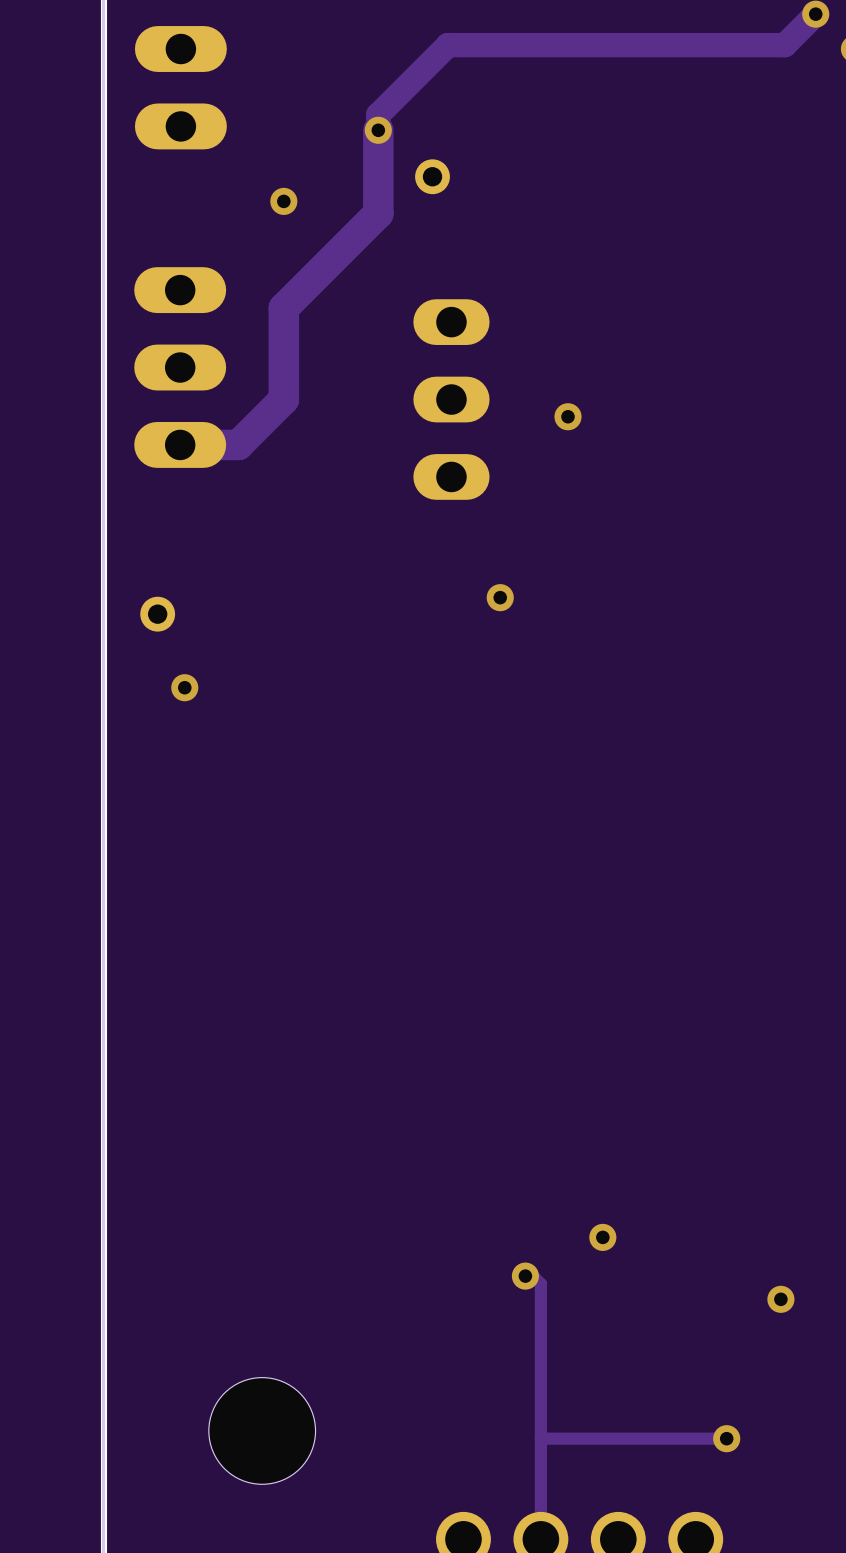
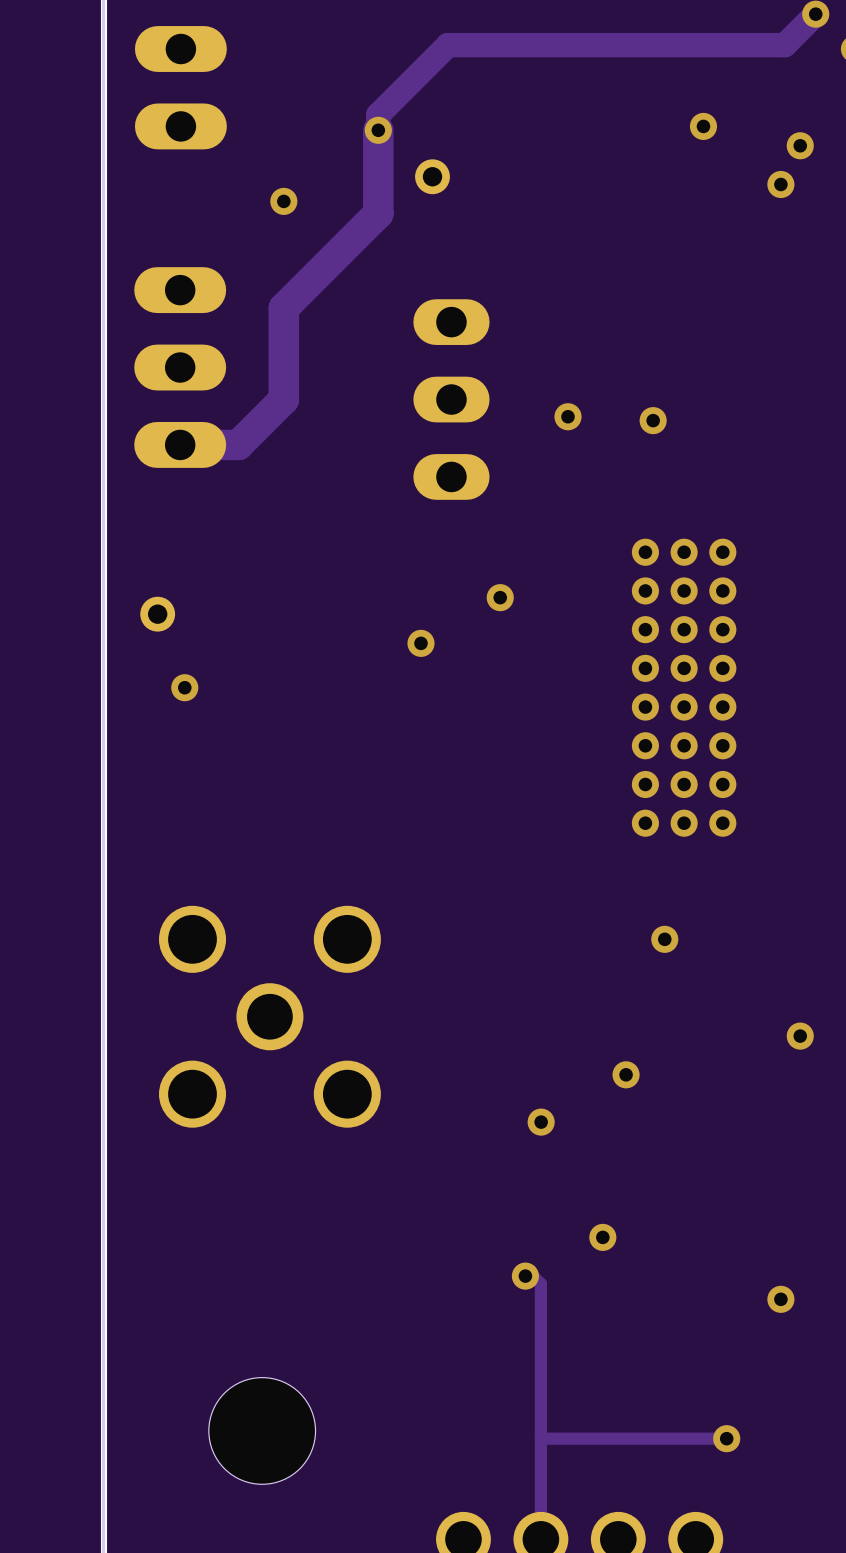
via: none -> (703, 126)
via: none -> (800, 145)
via: none -> (780, 184)
via: none -> (653, 420)
via: none -> (645, 552)
via: none -> (684, 552)
via: none -> (722, 552)
via: none -> (645, 590)
via: none -> (684, 590)
via: none -> (722, 590)
via: none -> (645, 629)
via: none -> (684, 629)
via: none -> (722, 629)
via: none -> (420, 643)
via: none -> (645, 668)
via: none -> (684, 668)
via: none -> (722, 668)
via: none -> (645, 707)
via: none -> (684, 707)
via: none -> (722, 707)
via: none -> (645, 745)
via: none -> (684, 745)
via: none -> (722, 745)
via: none -> (645, 784)
via: none -> (684, 784)
via: none -> (722, 784)
via: none -> (645, 823)
via: none -> (684, 823)
via: none -> (722, 823)
via: none -> (664, 939)
part: none -> (269, 1016)
via: none -> (800, 1036)
via: none -> (626, 1074)
via: none -> (541, 1122)

